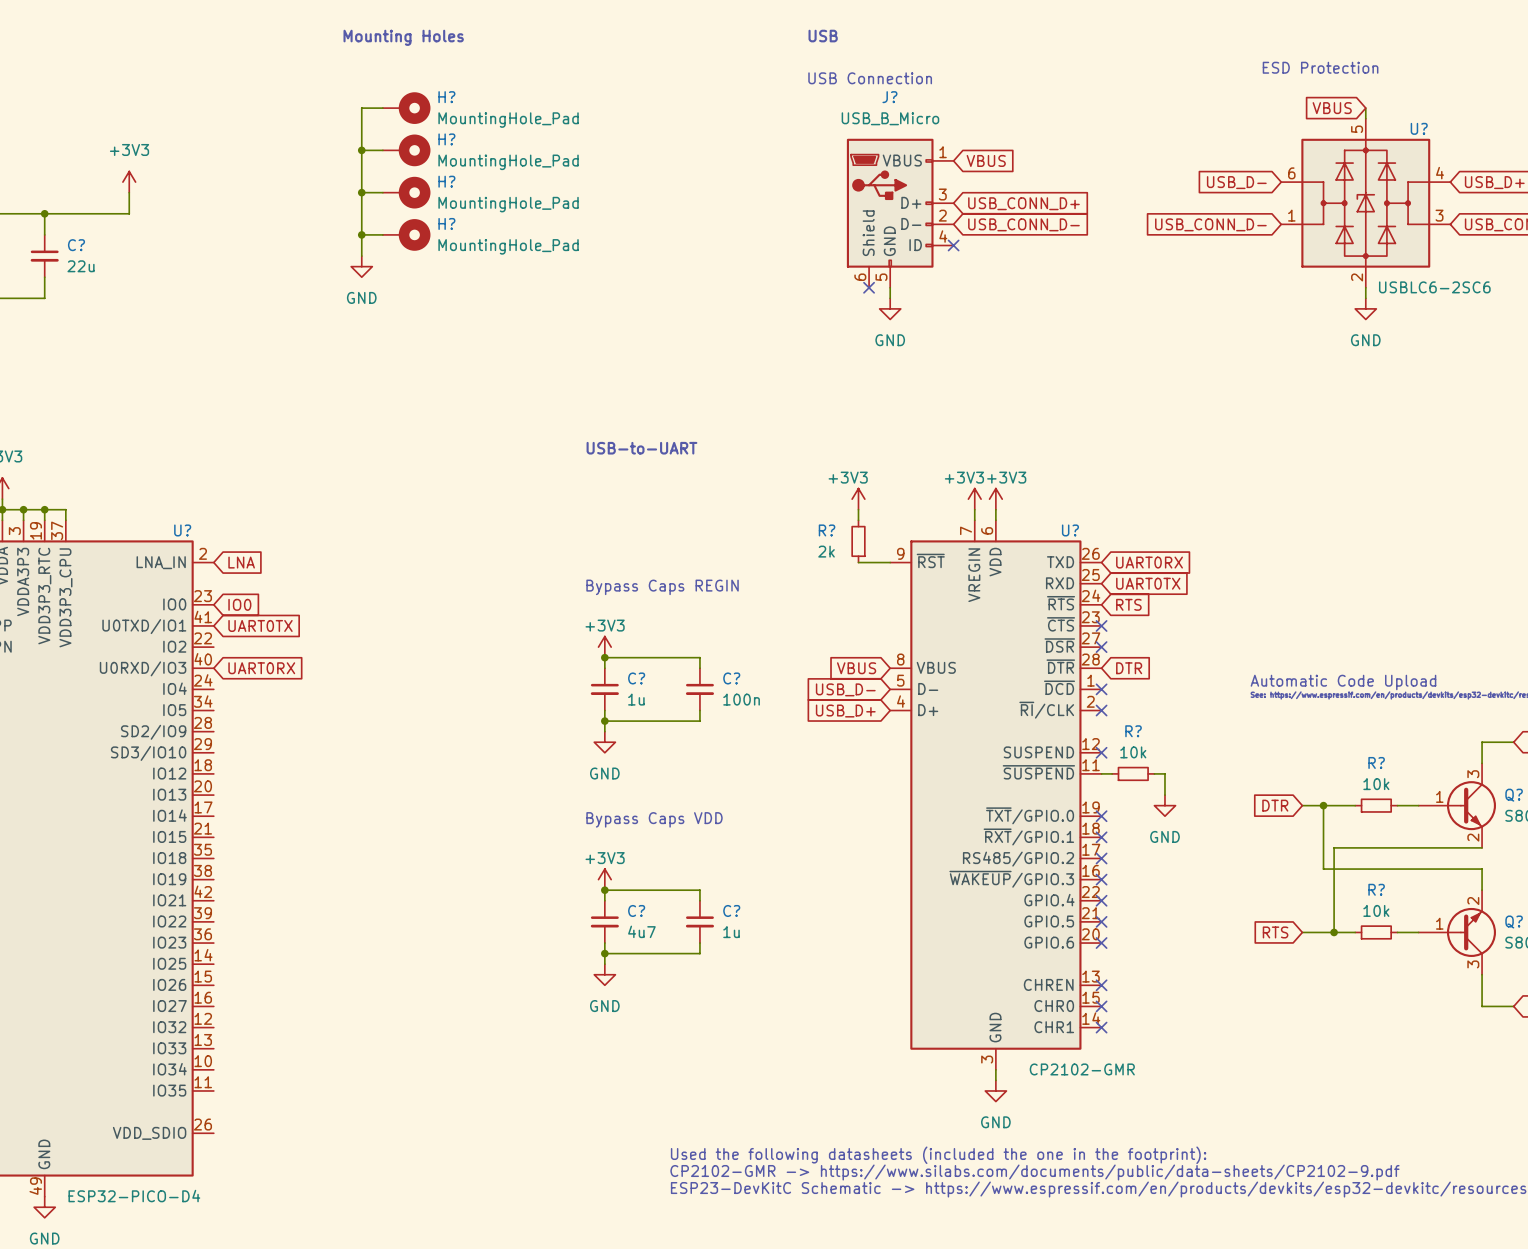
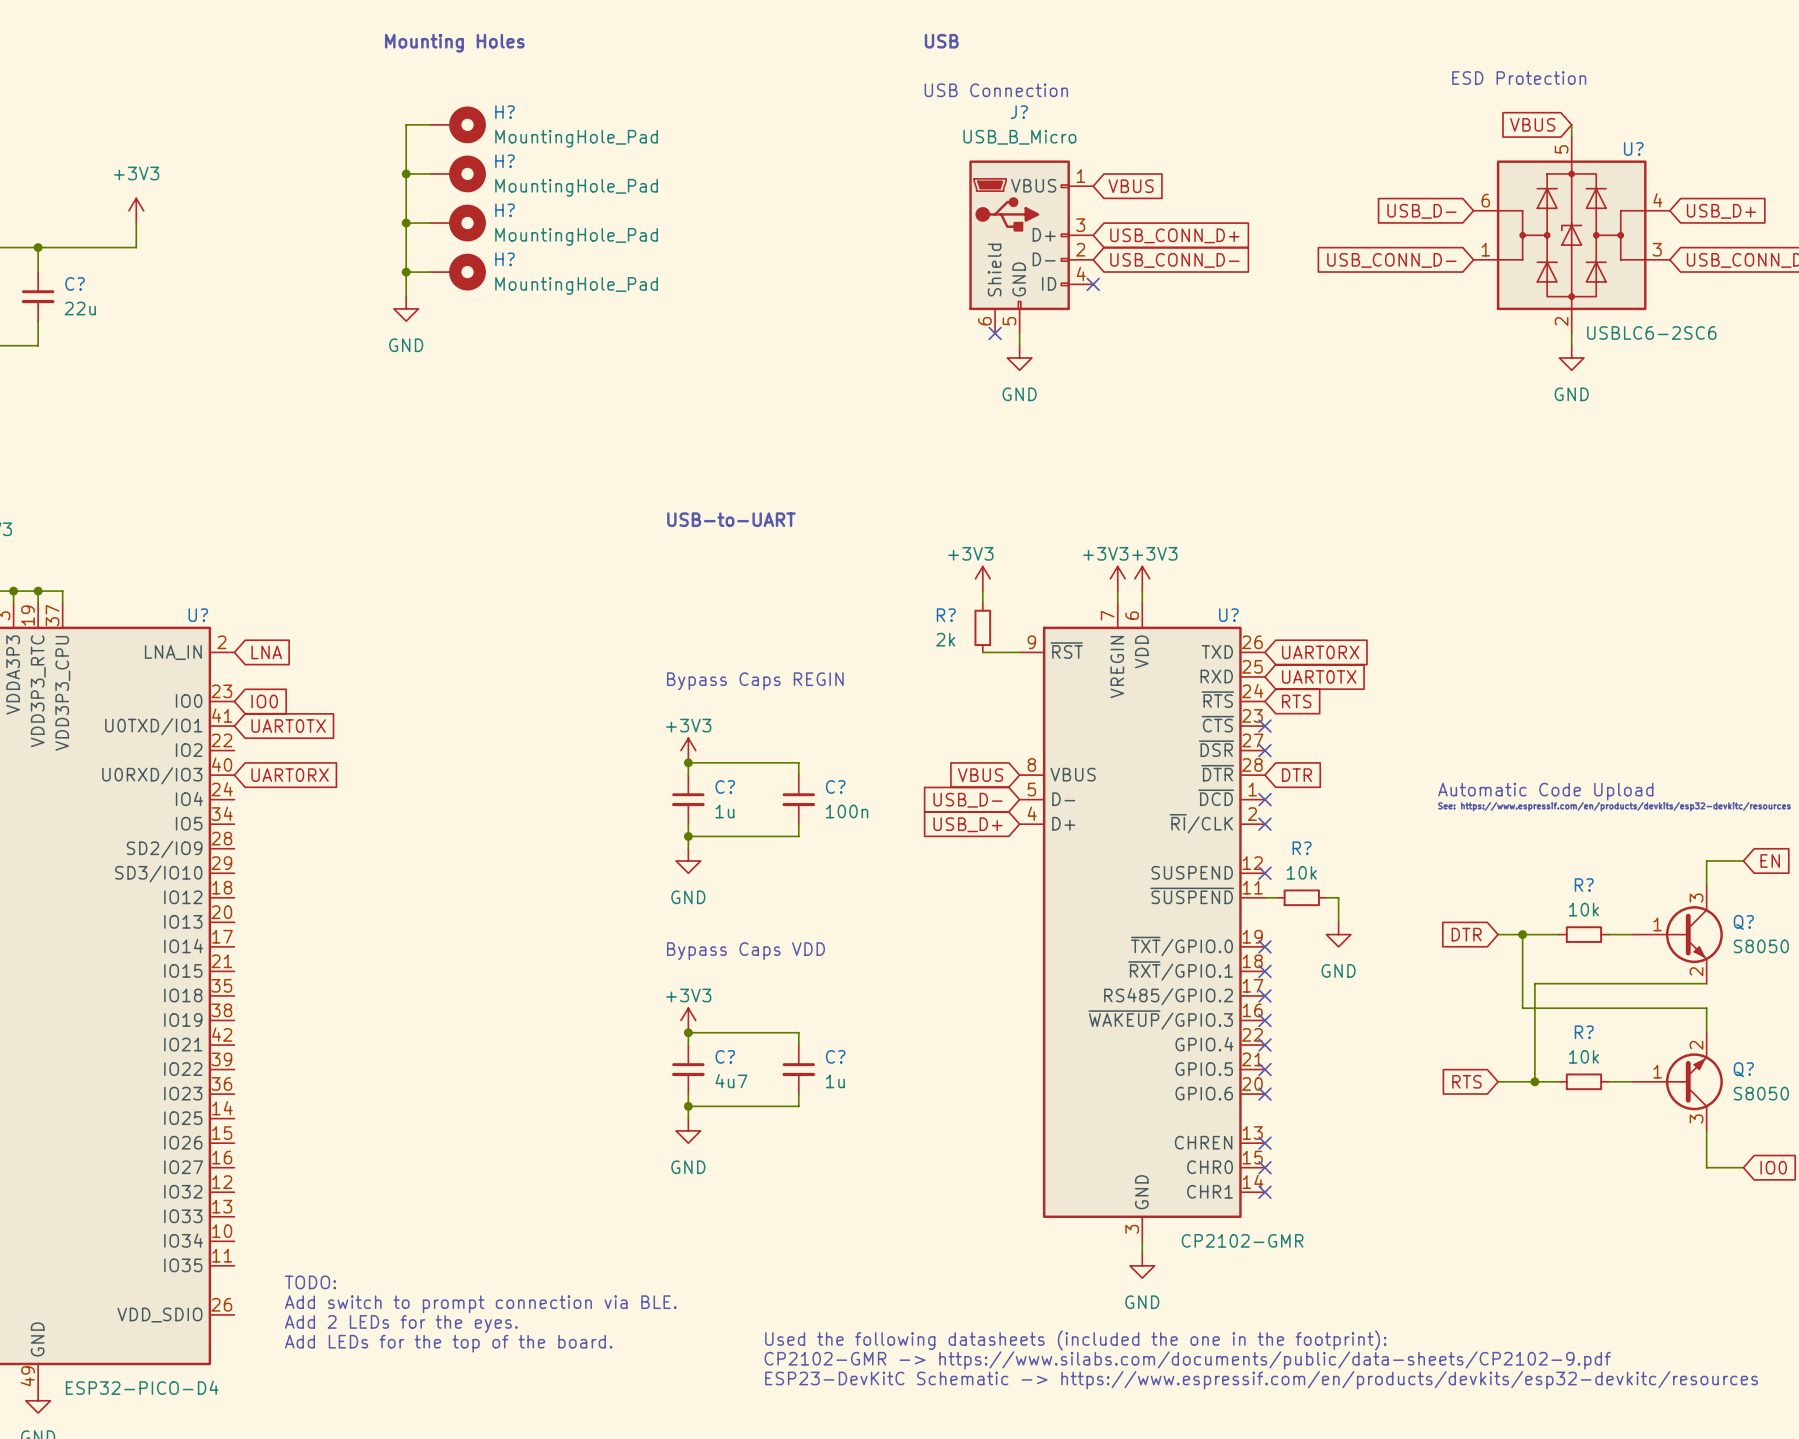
text: none -> TODO: (310, 1282)
text: none -> Add switch to prompt connection via BLE. (480, 1304)
text: none -> Add 2 LEDs for the eyes. (401, 1323)
text: none -> Add LEDs for the top of the board. (448, 1343)

